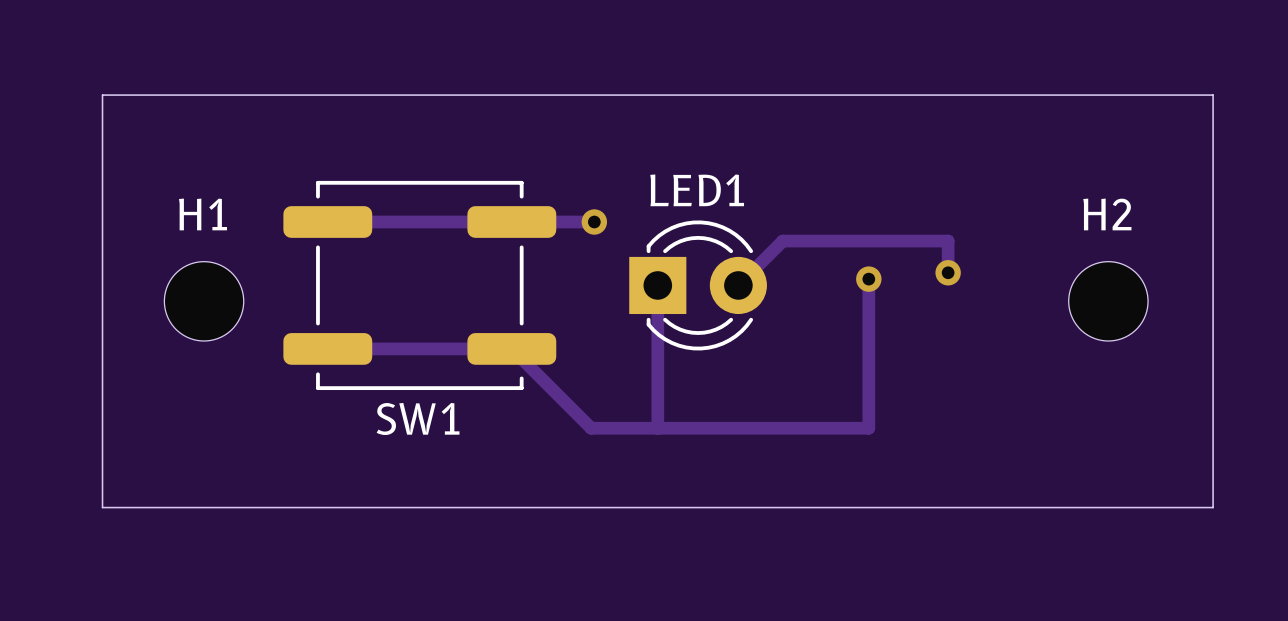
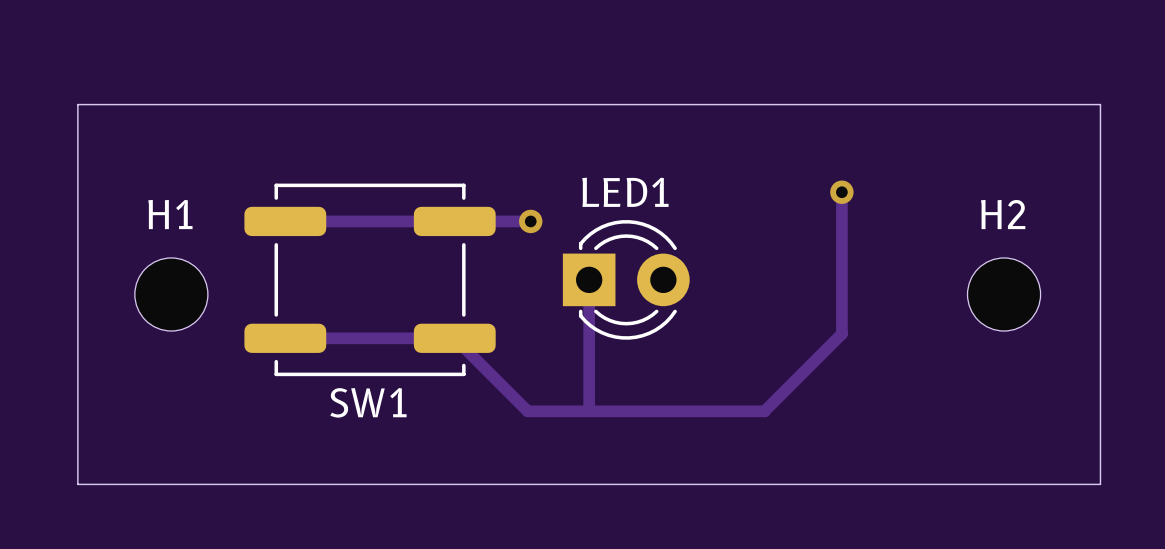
via: none -> (841, 192)
track: (948, 272) (948, 241) (782, 241) (738, 285) -> none
via: (948, 272) -> none
track: (868, 279) (868, 428) (848, 428) -> (841, 192) (841, 333) (764, 411)
via: (868, 279) -> none

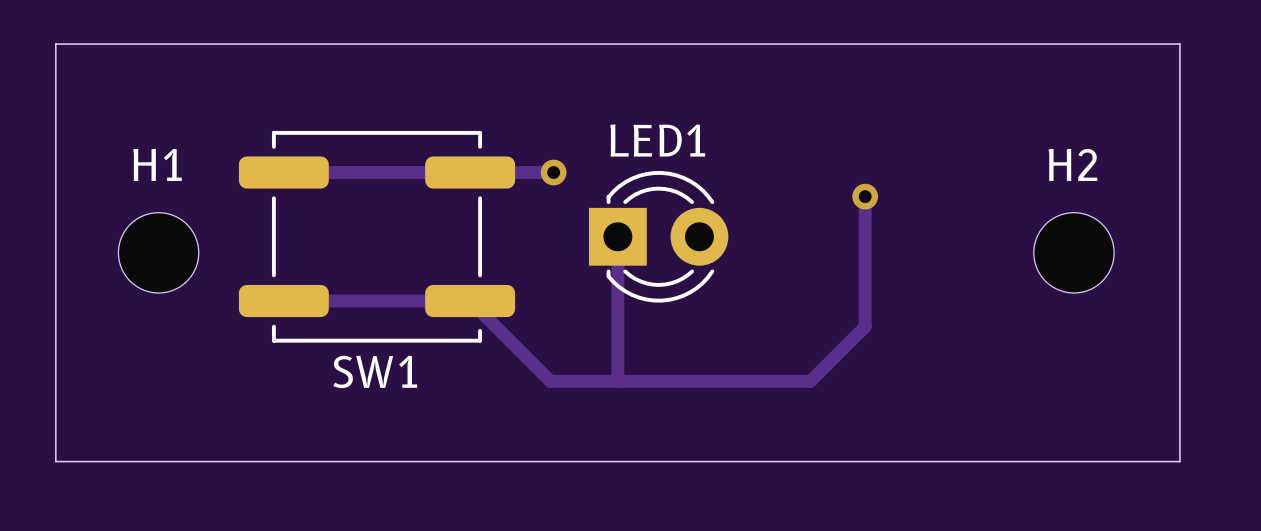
track: (841, 192) (841, 333) (814, 361) -> (865, 196) (865, 326)
via position: (841, 192) -> (865, 196)

